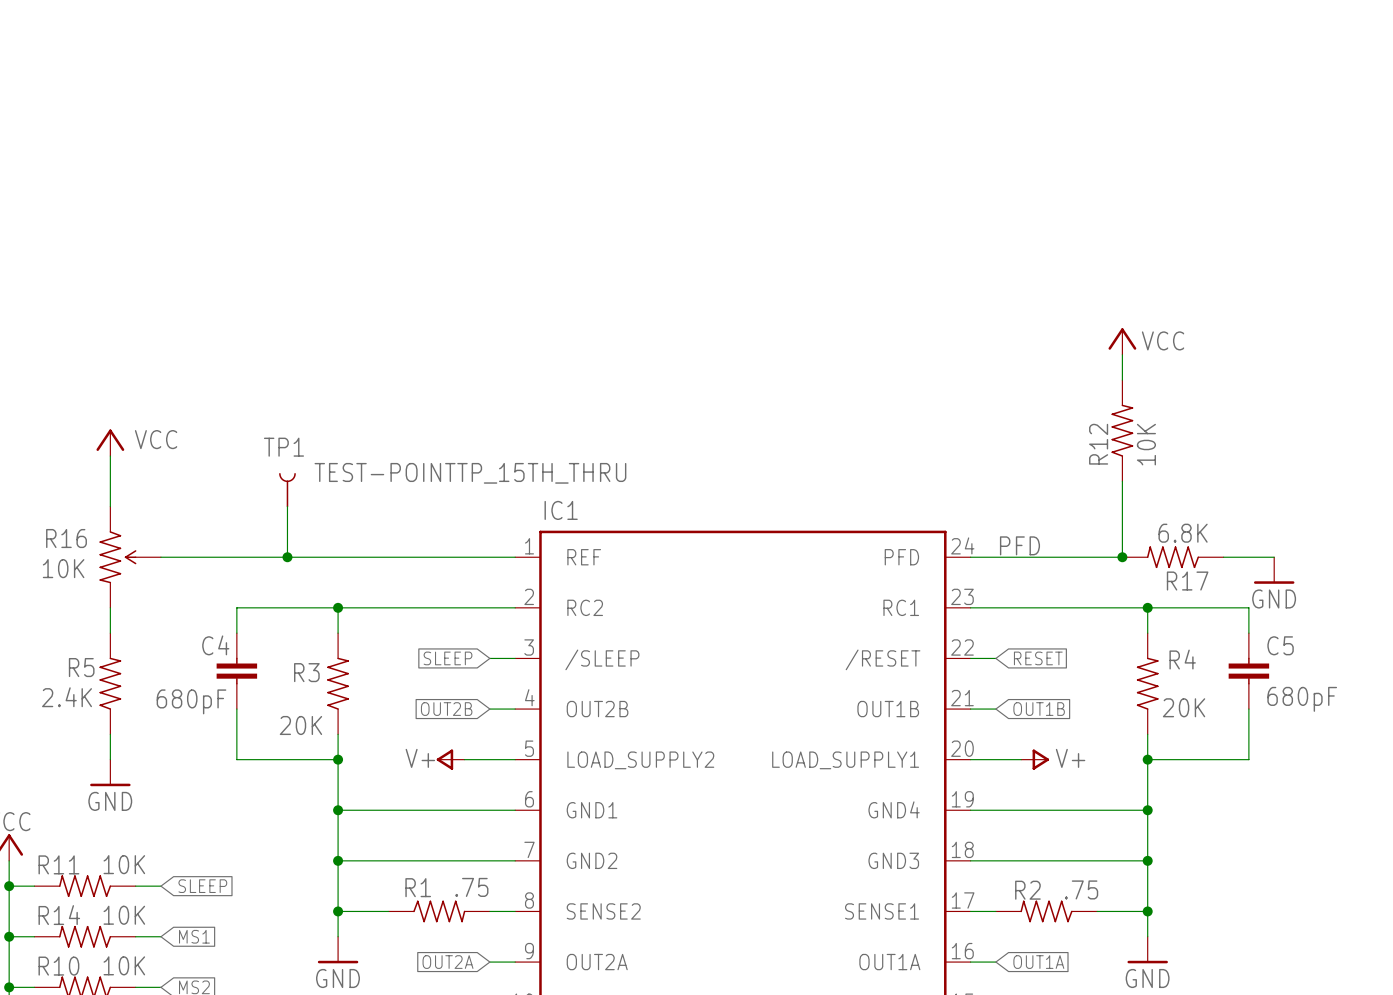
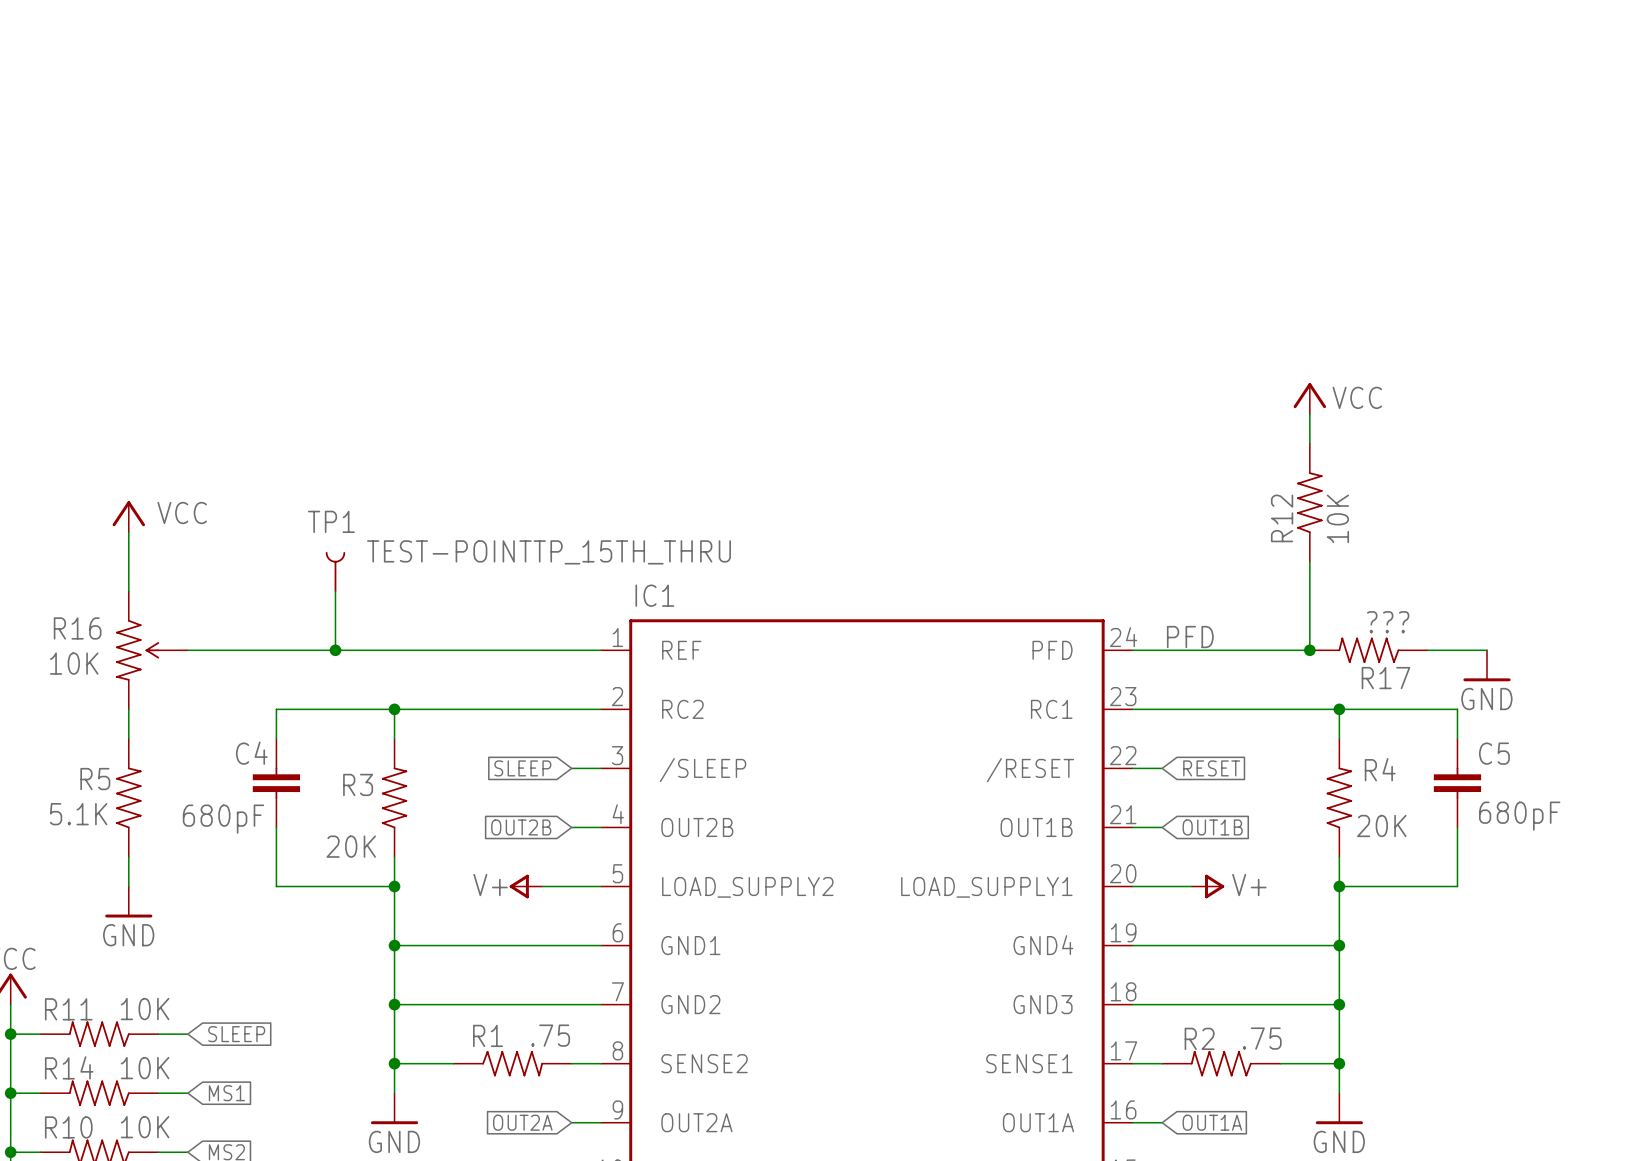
R17 value: 6.8K (1183, 533) -> ??? (1388, 622)
R5 value: 2.4K (67, 697) -> 5.1K (78, 814)

